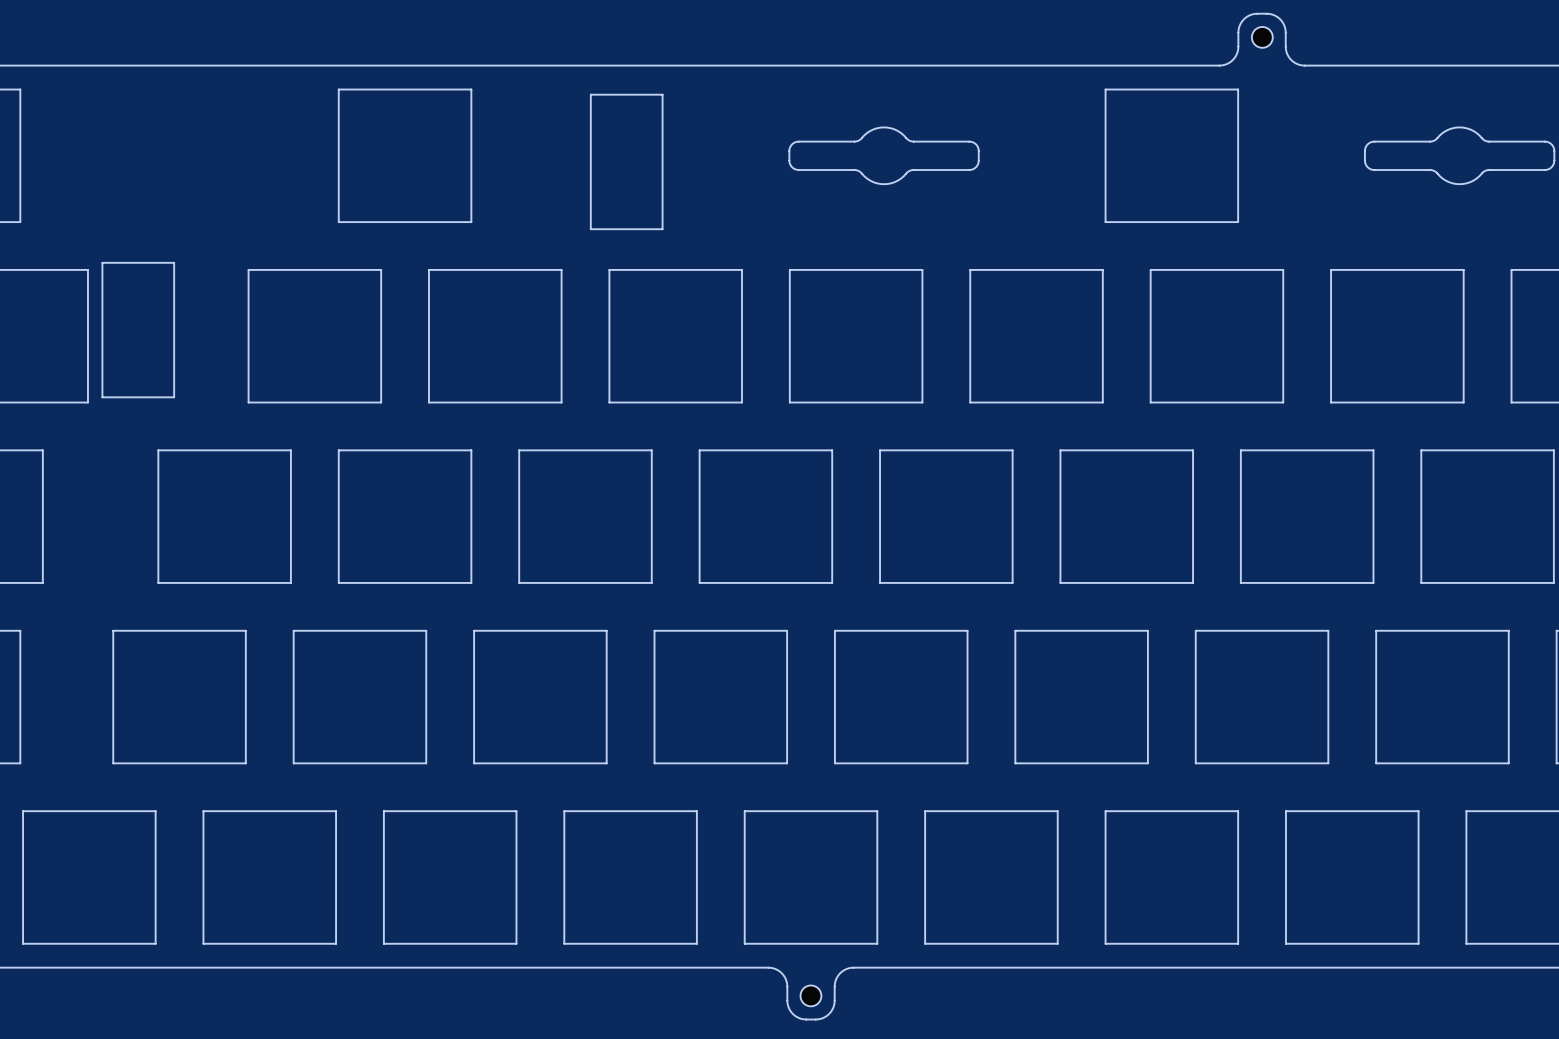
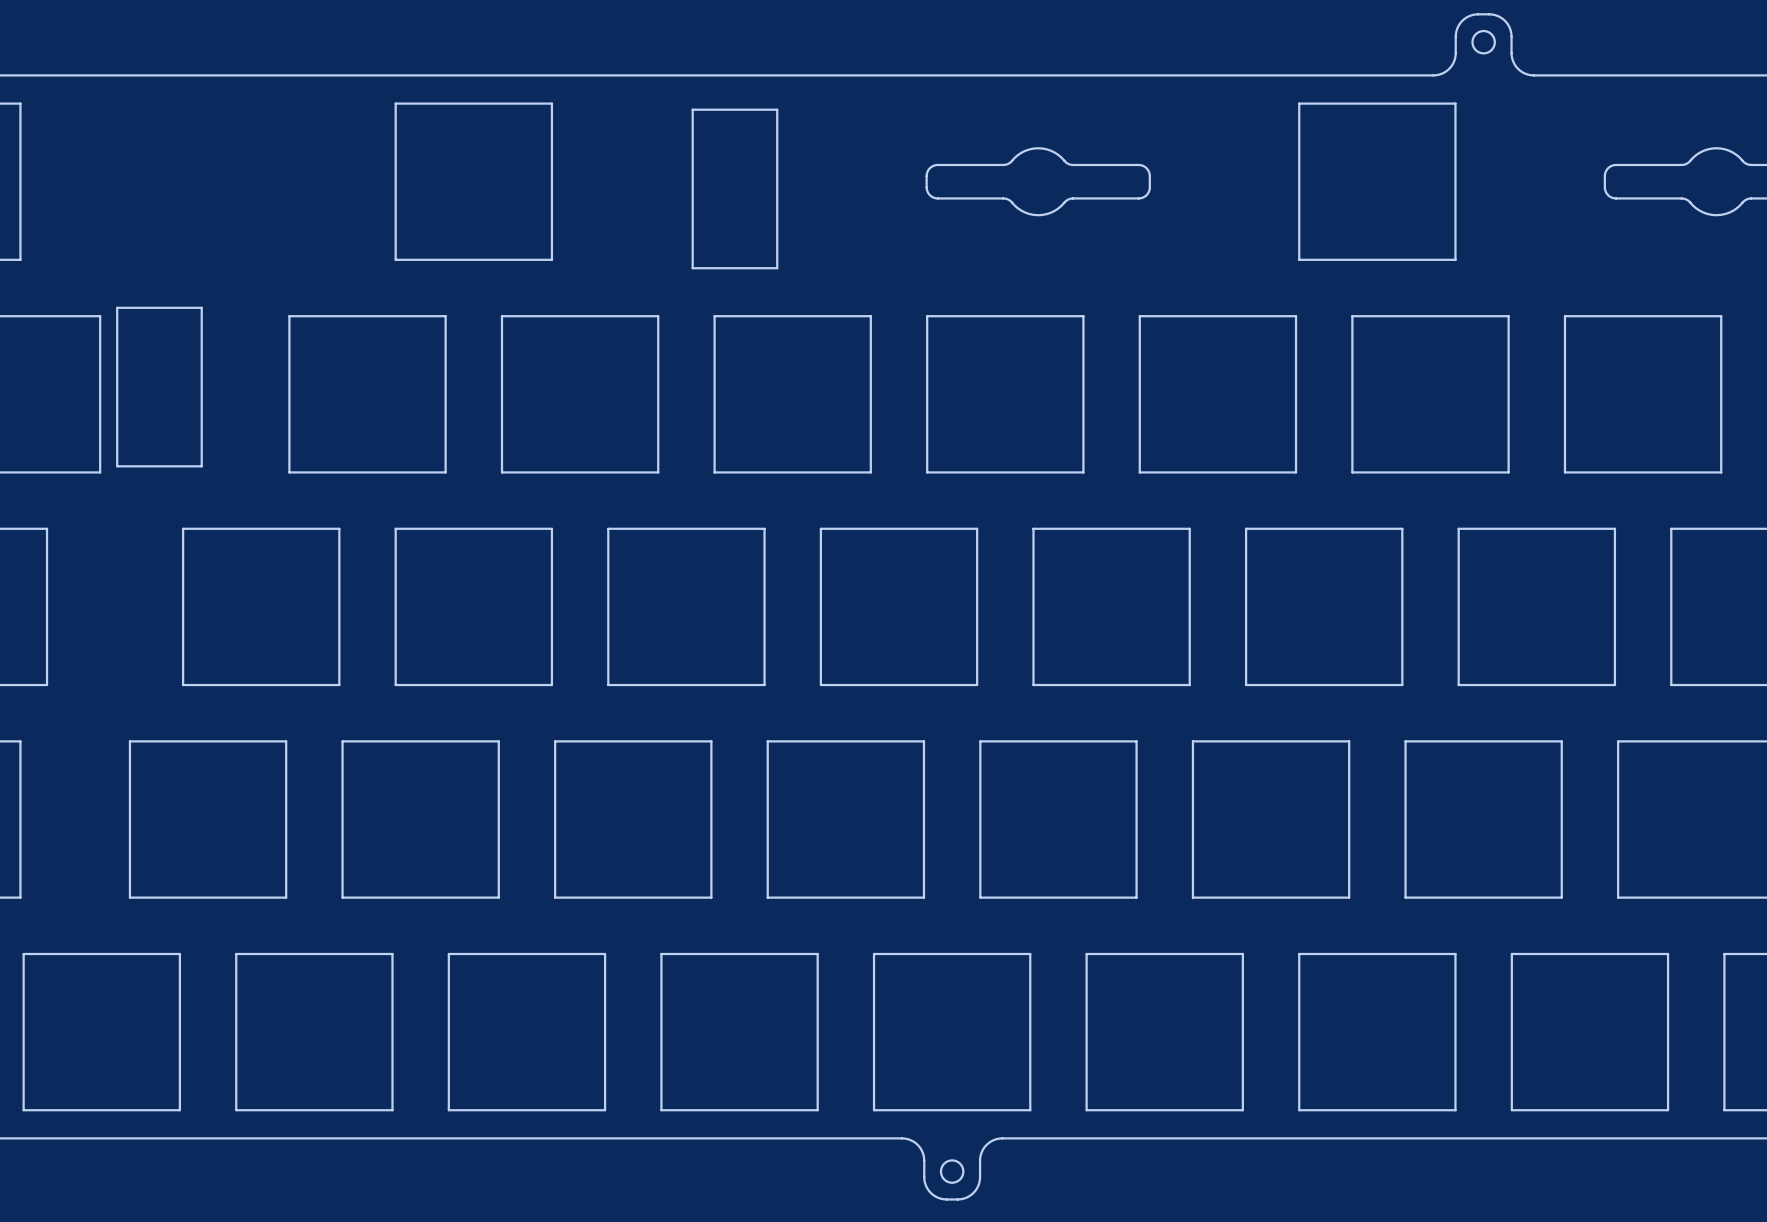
round board edge: none -> [1471, 29, 1496, 55]
part: (1262, 37) -> none
round board edge: none -> [939, 1159, 965, 1184]
part: (810, 995) -> none

